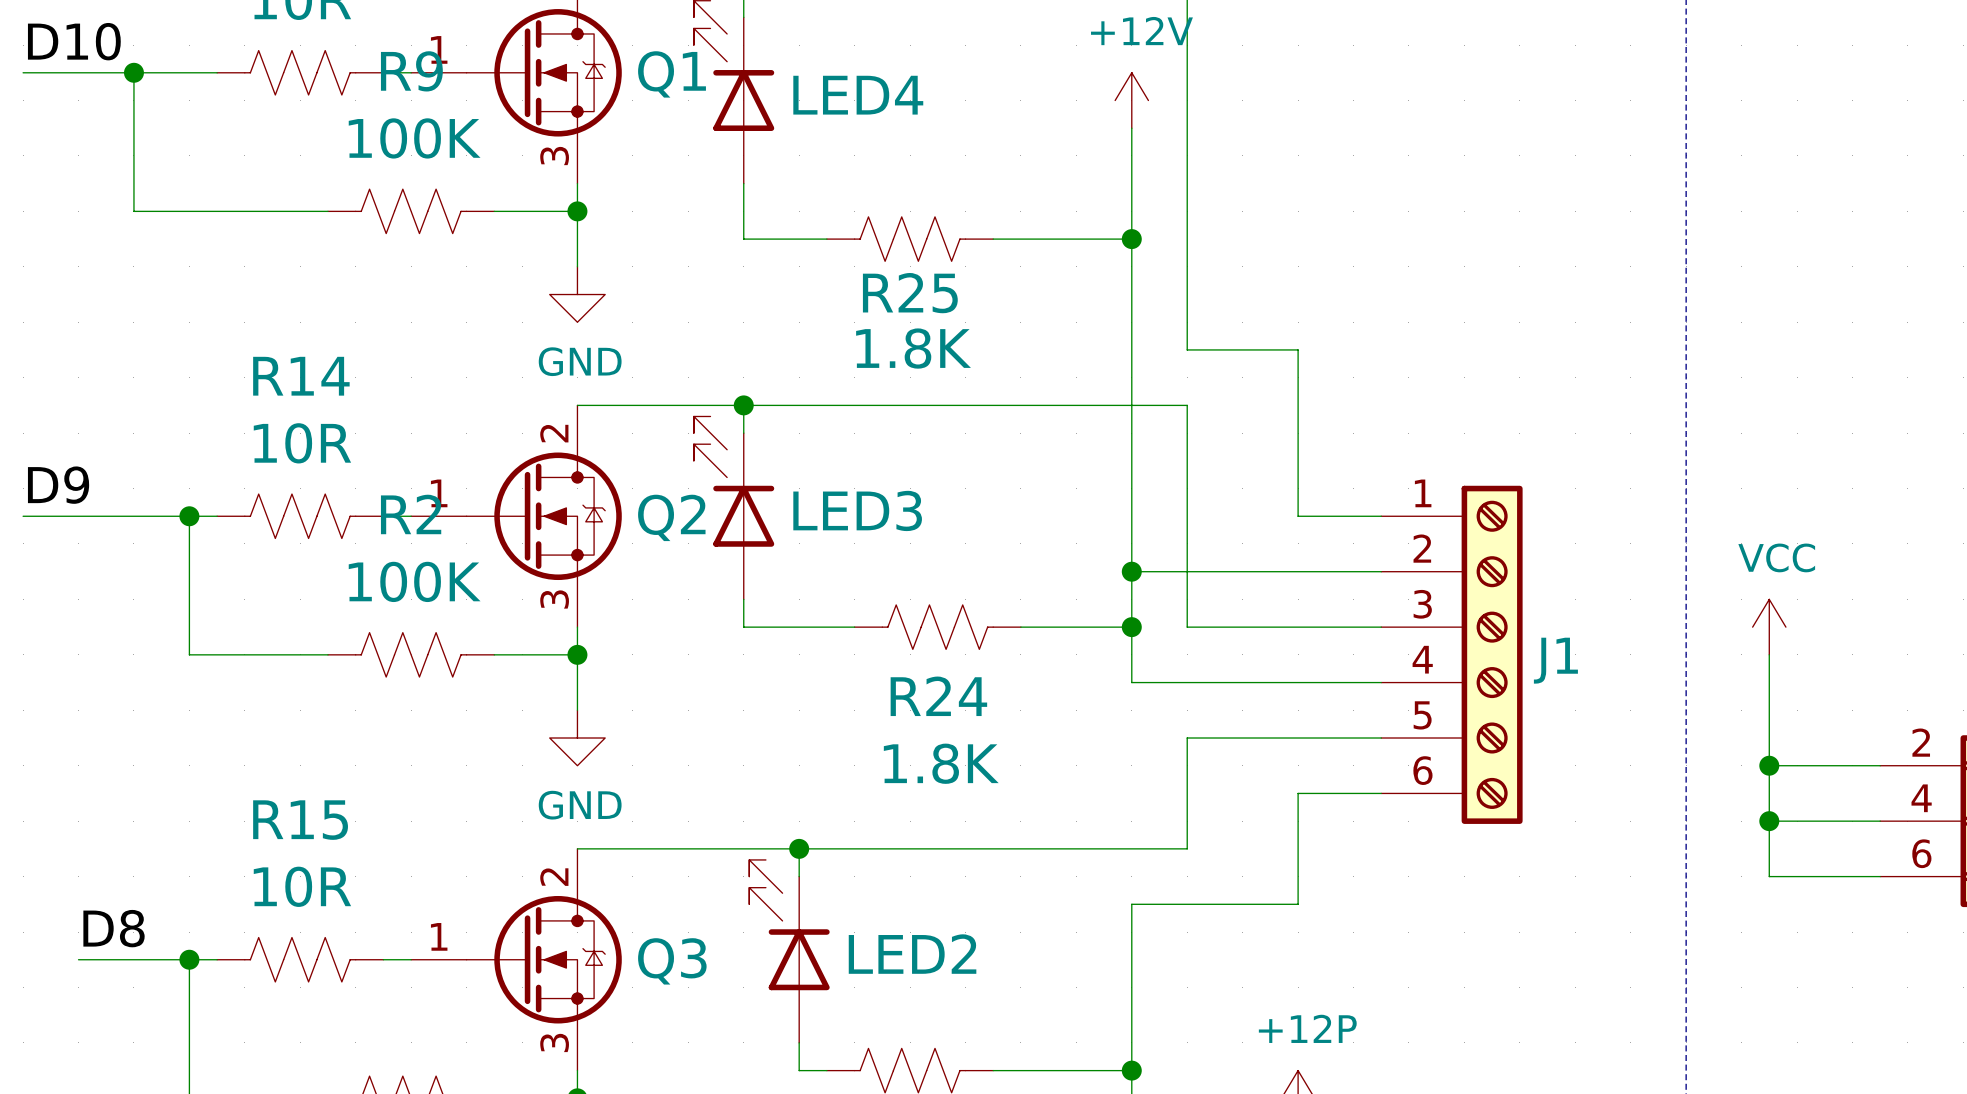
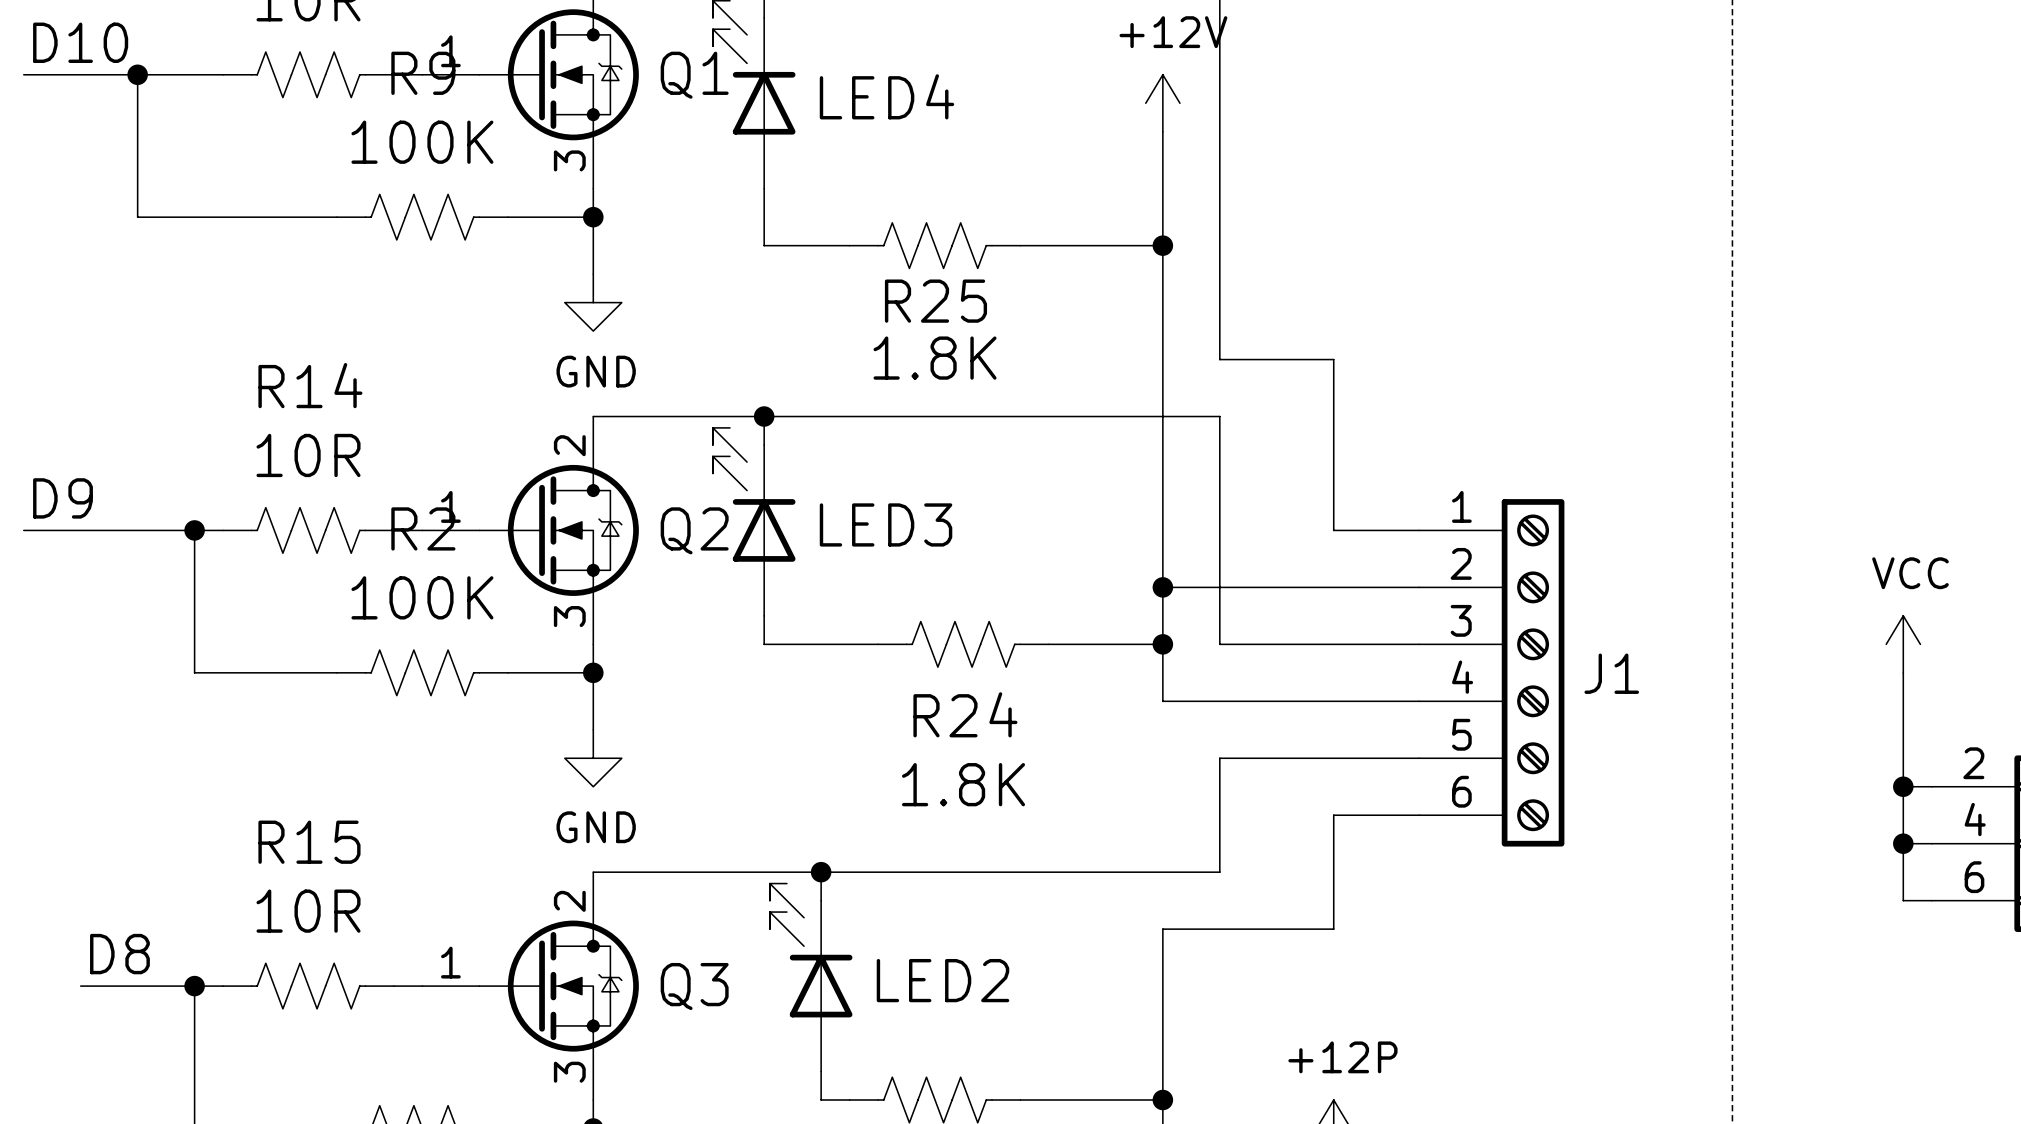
power symbol position: VCC (1769, 627) -> VCC (1903, 644)
wire: (1769, 654) (1769, 876) (1852, 876) -> (1903, 672) (1903, 900)
wire: (1769, 765) (1852, 765) -> none
junction: (1769, 765) -> none
junction: none -> (1903, 786)
wire: (1769, 821) (1852, 821) -> none
junction: (1769, 821) -> none
junction: none -> (1903, 843)

